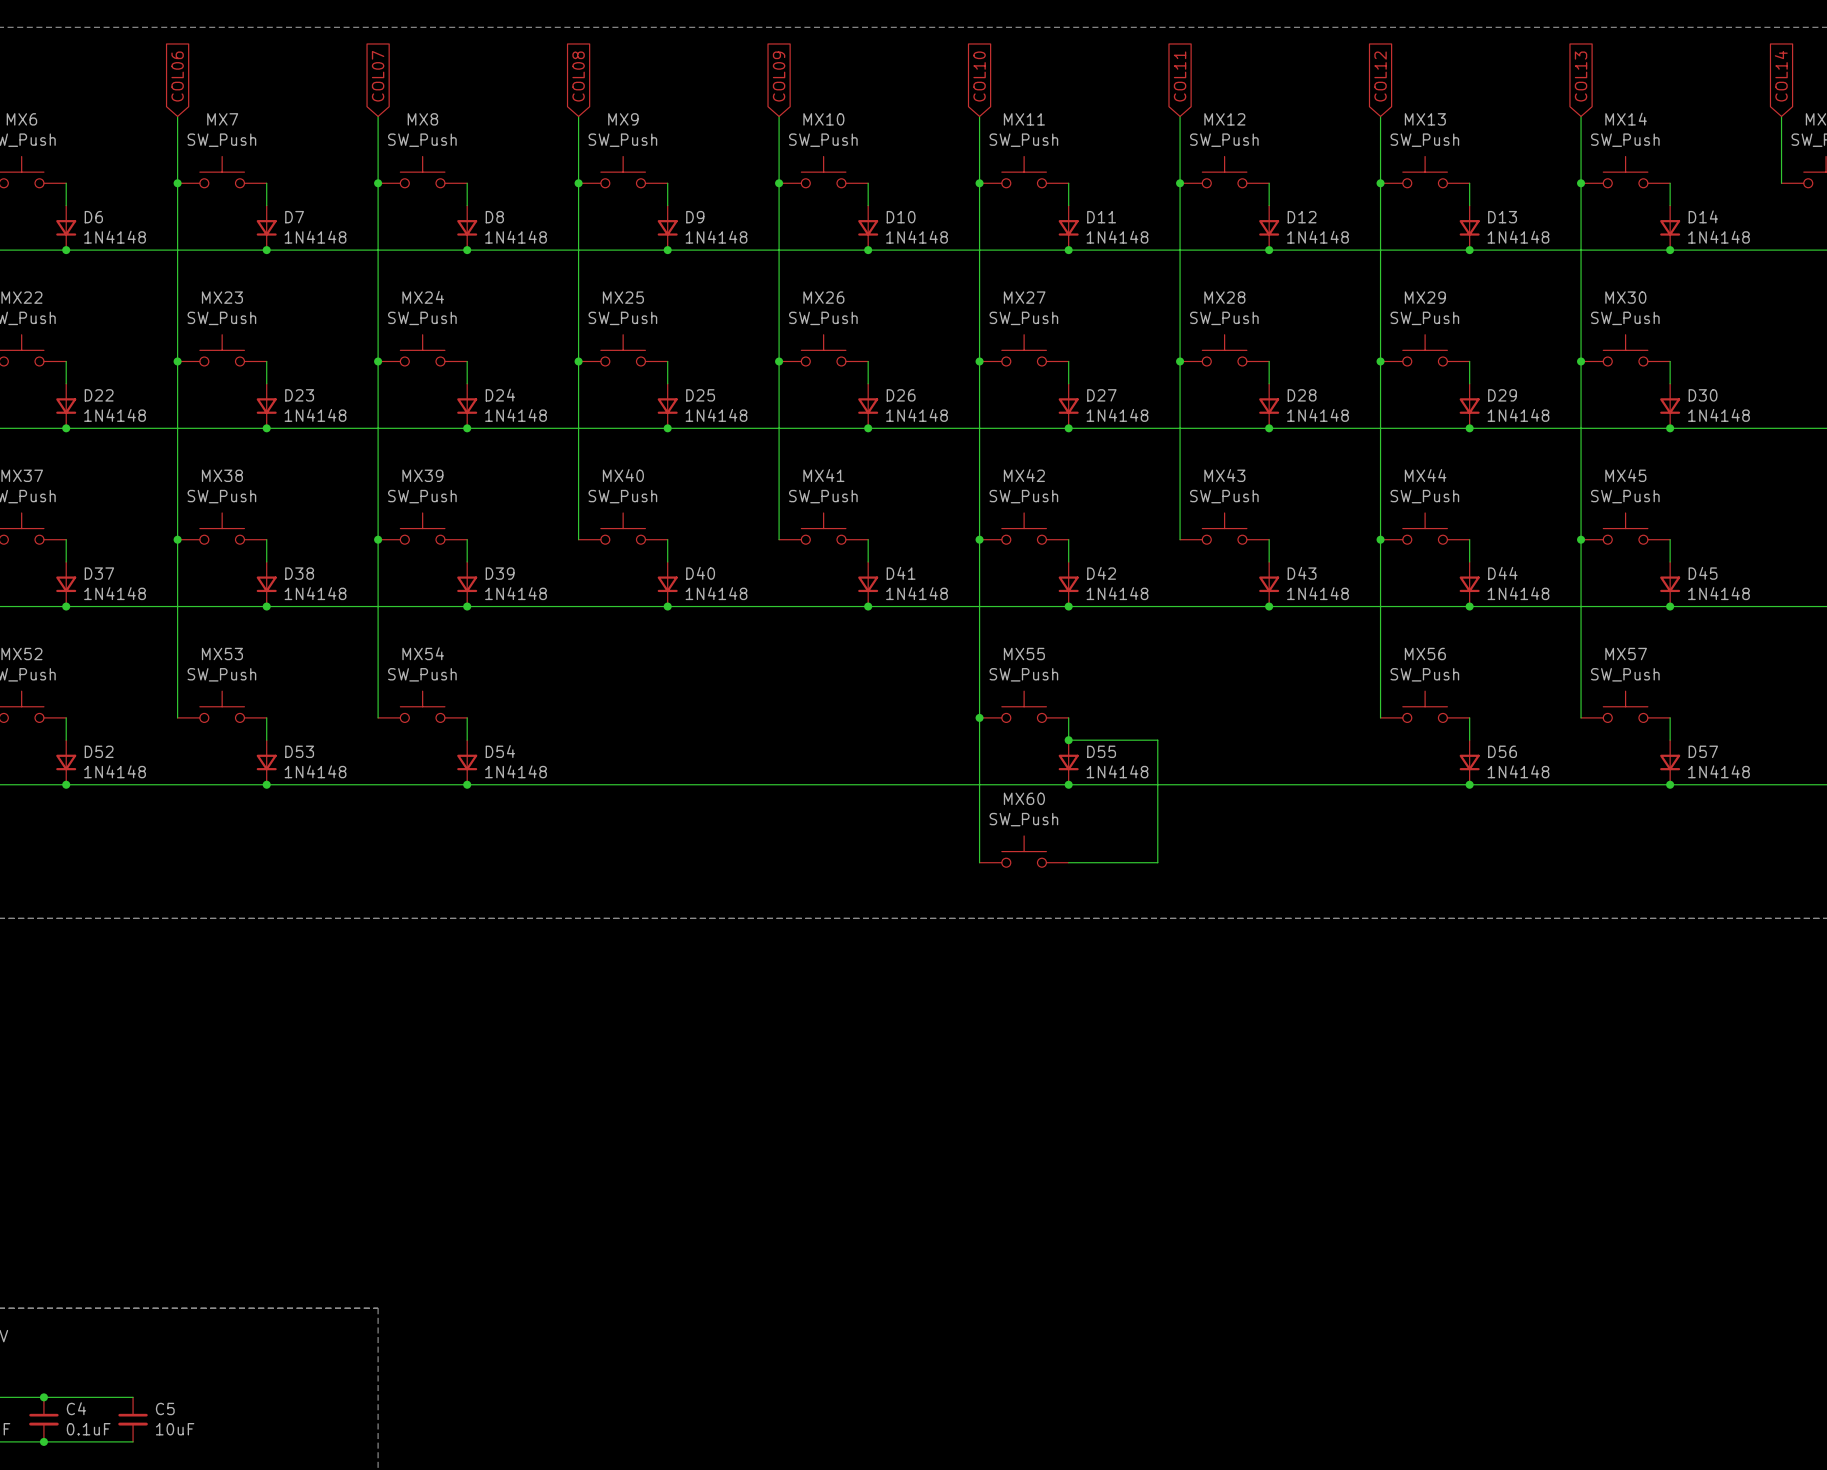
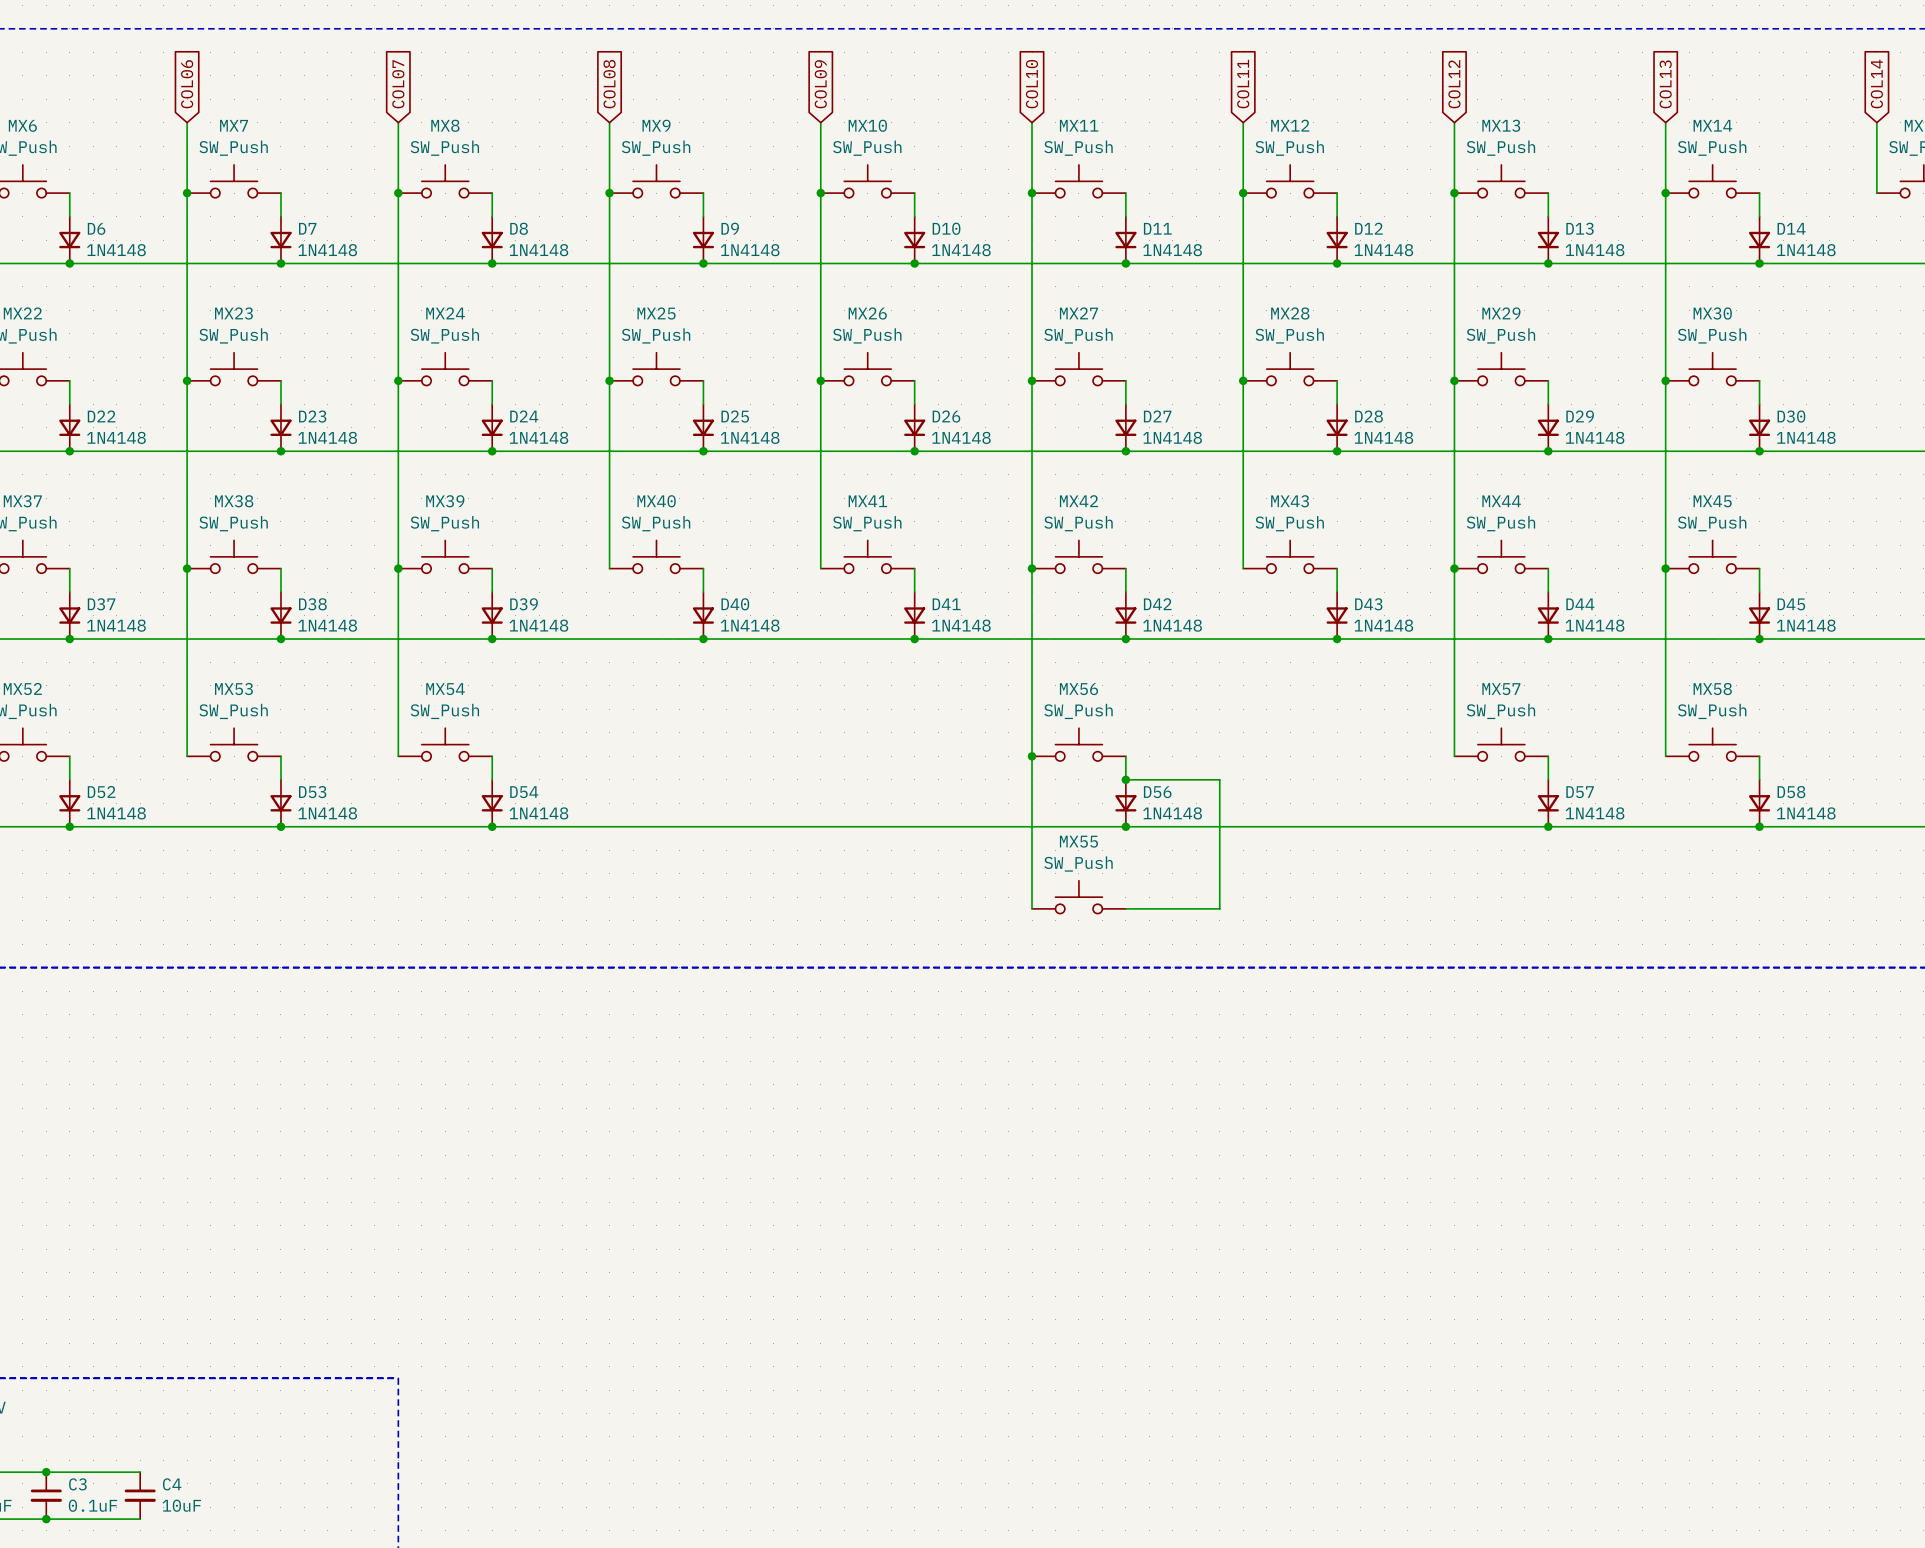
MX55 name: MX55 (1024, 654) -> MX56 (1078, 689)
MX56 name: MX56 (1425, 654) -> MX57 (1501, 689)
MX57 name: MX57 (1626, 654) -> MX58 (1712, 689)
D55 name: D55 (1101, 751) -> D56 (1157, 792)
D56 name: D56 (1502, 751) -> D57 (1580, 792)
D57 name: D57 (1703, 751) -> D58 (1791, 792)
MX60 name: MX60 (1024, 798) -> MX55 (1078, 841)
C4 name: C4 (76, 1408) -> C3 (77, 1484)
C5 name: C5 (165, 1408) -> C4 (172, 1484)

